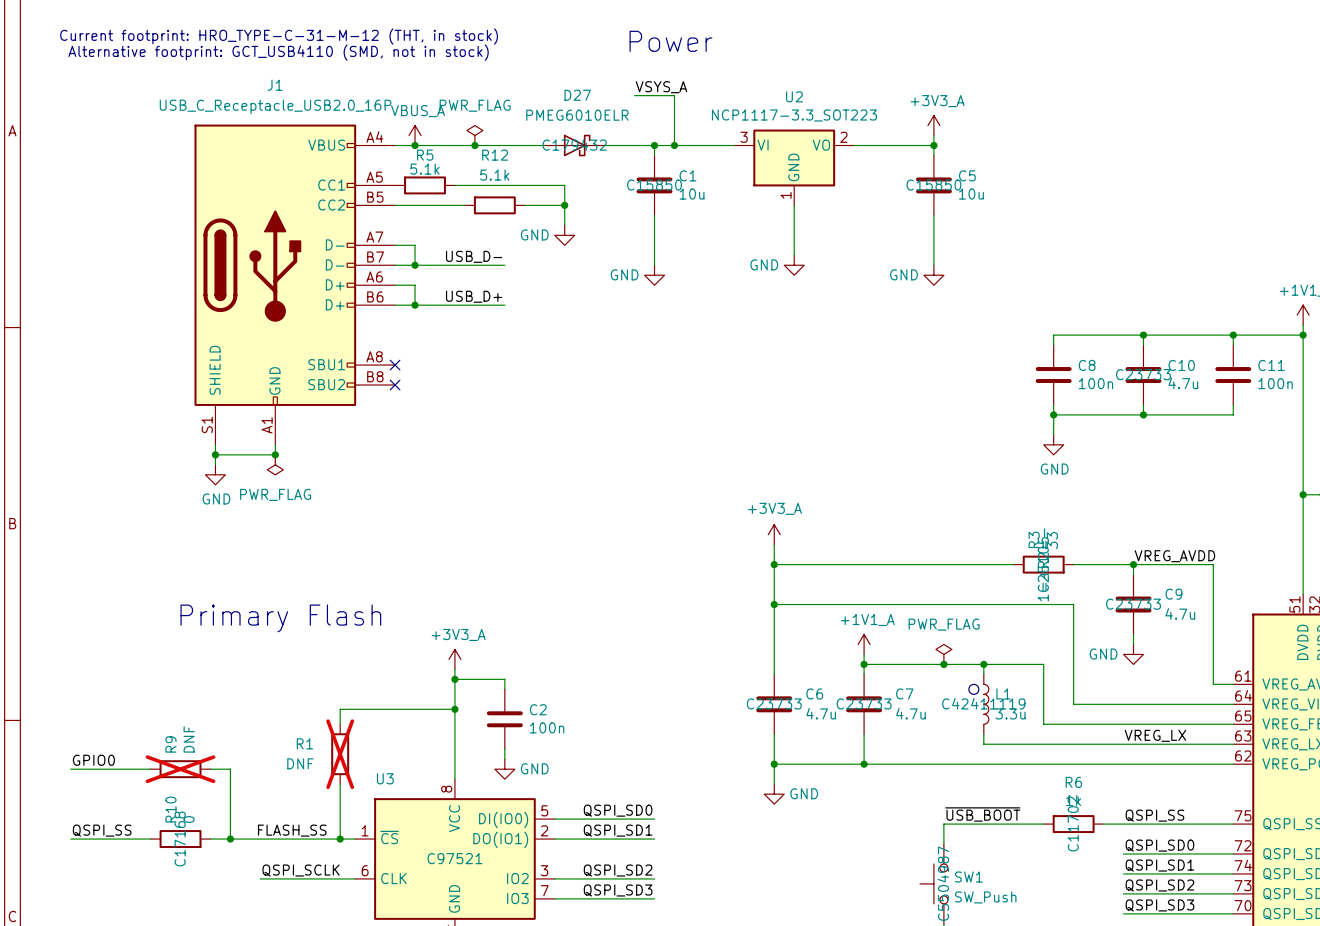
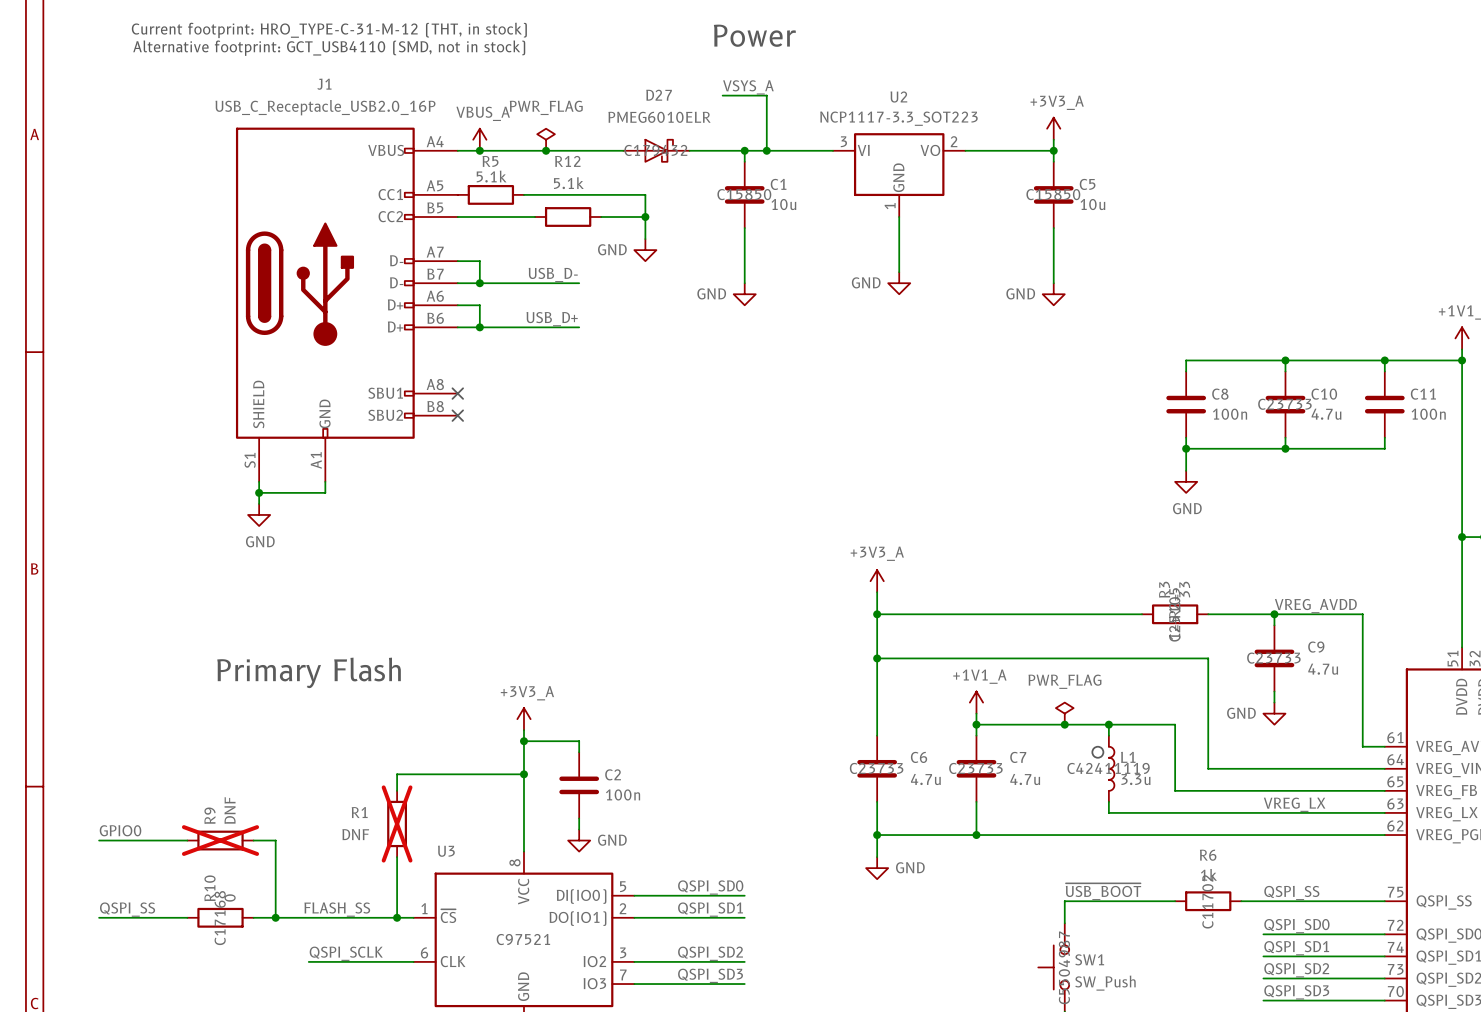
junction: (275, 454) -> none
power symbol: PWR_FLAG (275, 464) -> none

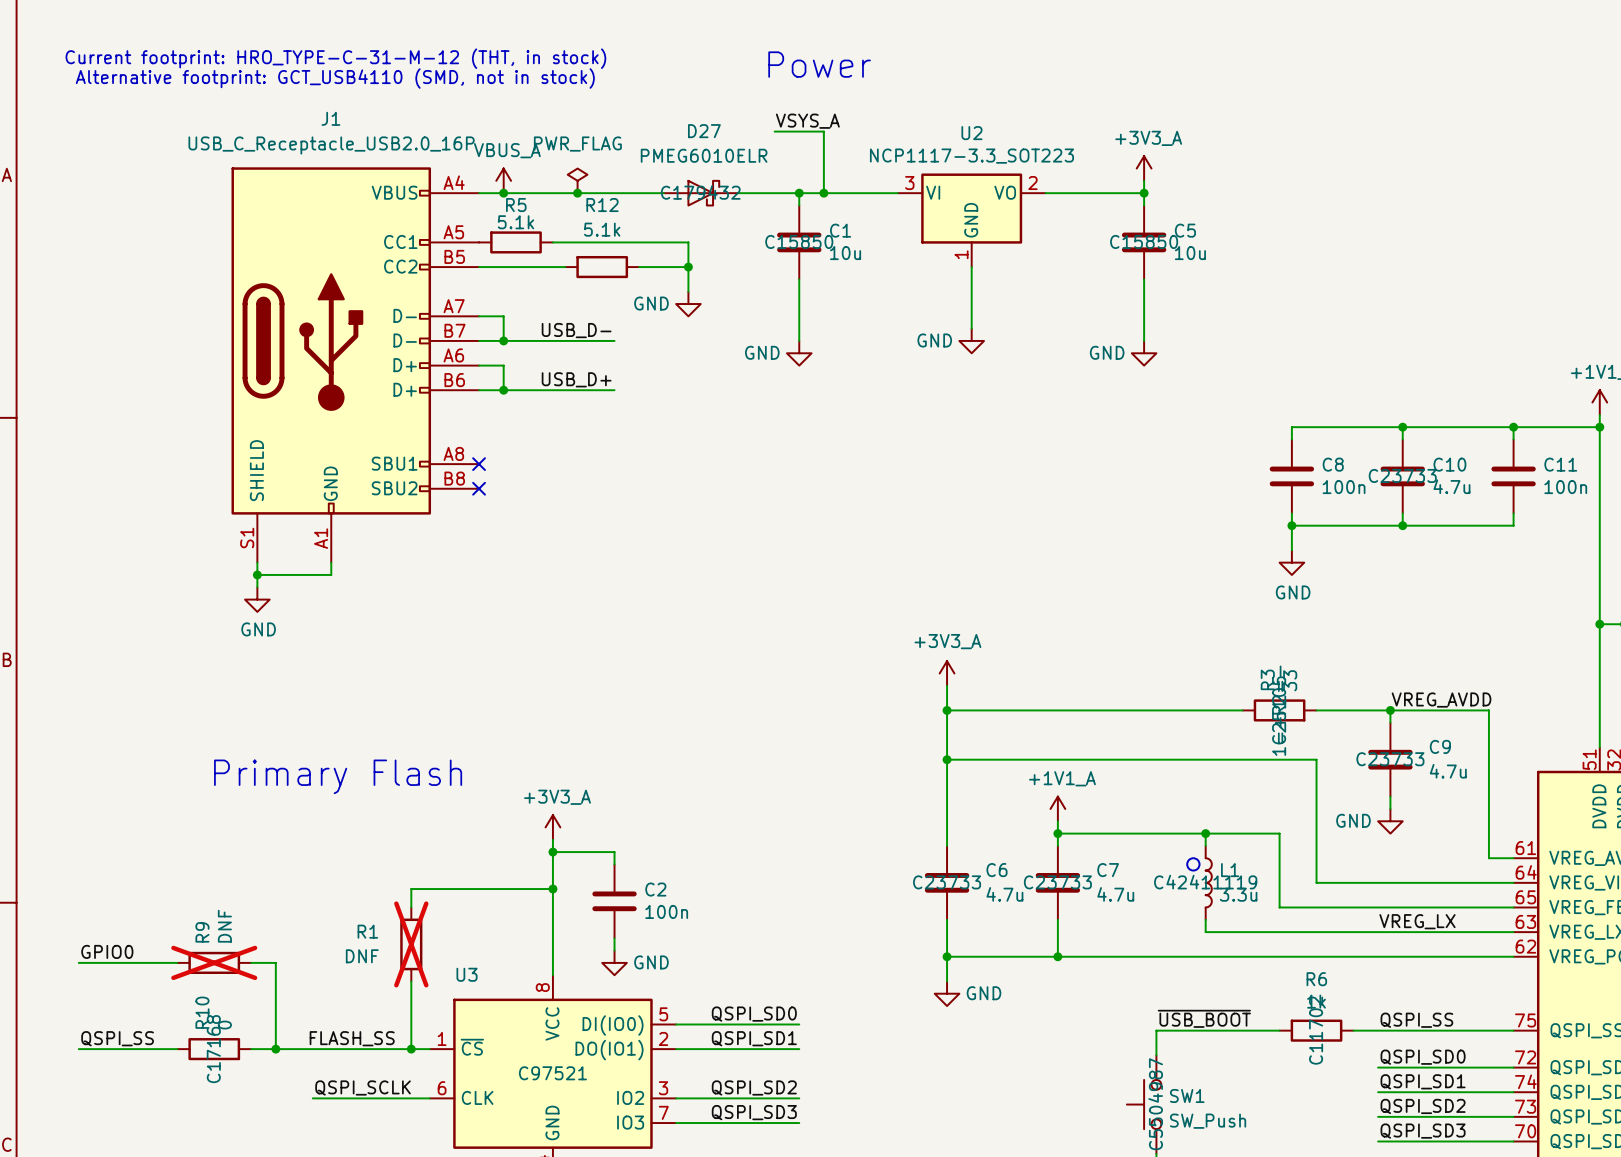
power symbol: PWR_FLAG (1064, 713) -> none
junction: (1064, 724) -> none

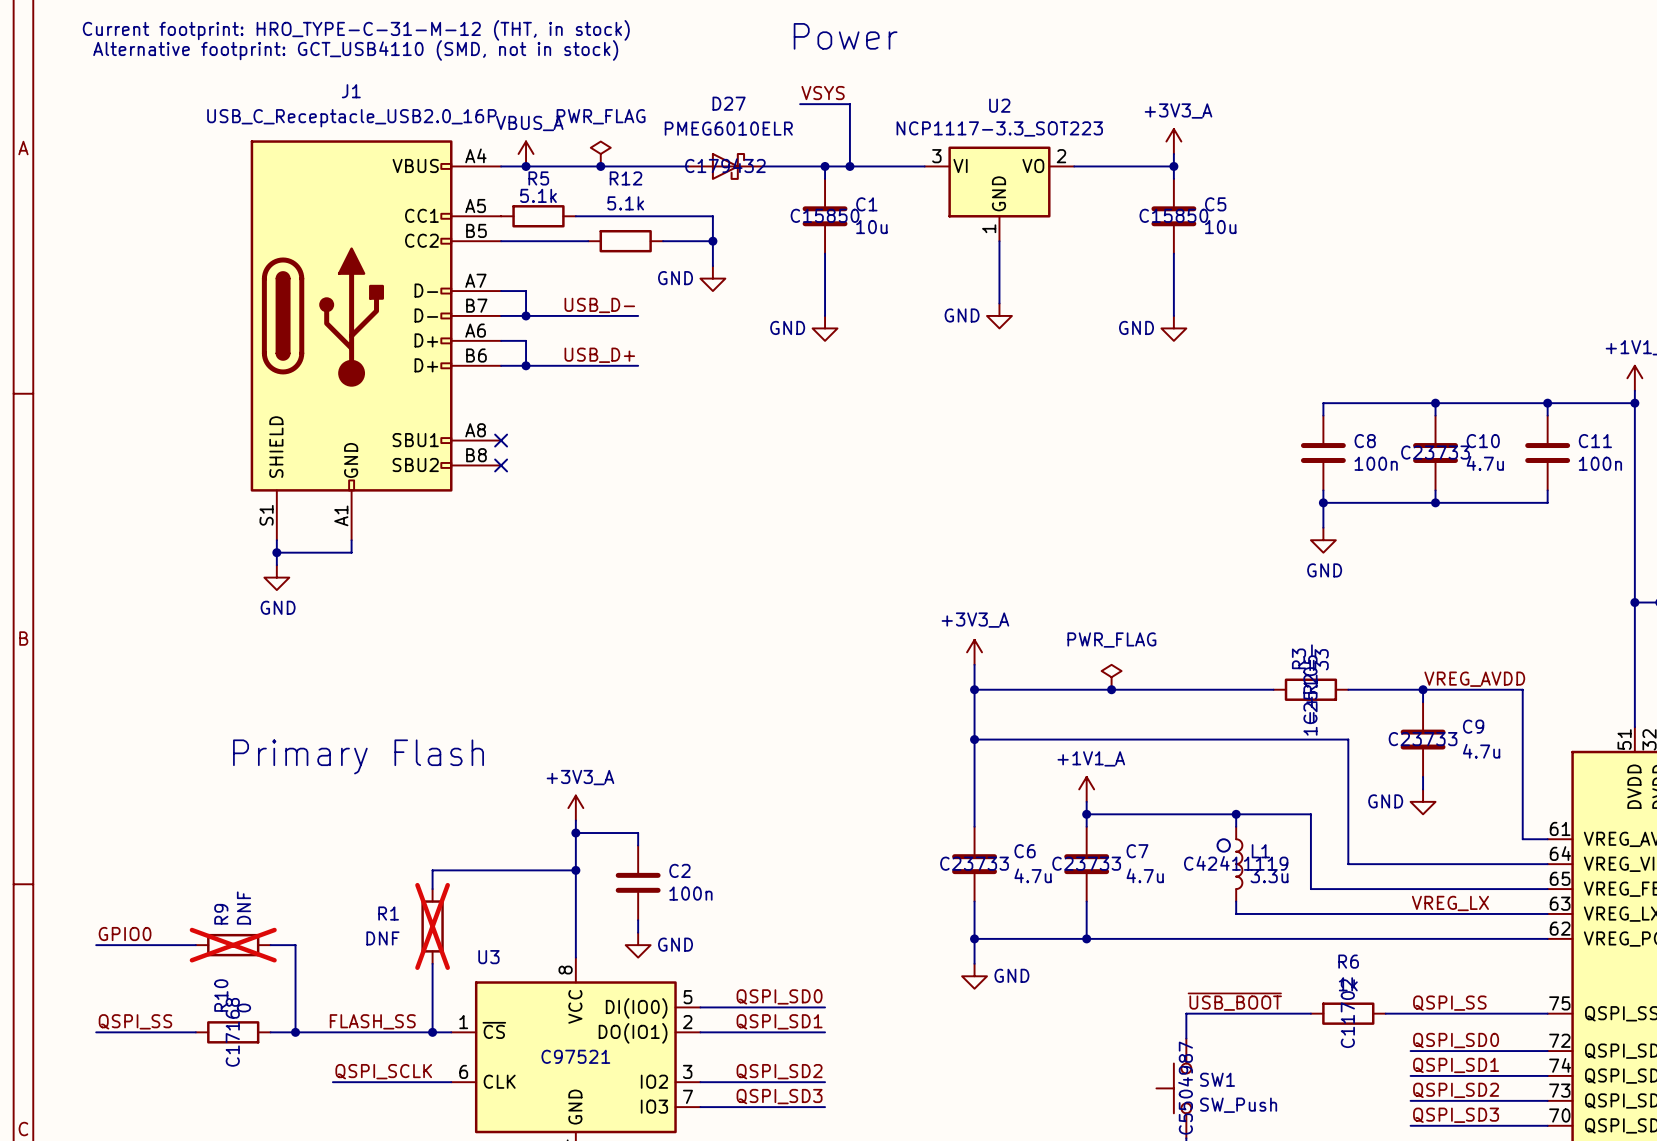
label: VSYS_A (807, 121) -> VSYS (823, 93)
power symbol: none -> PWR_FLAG (1111, 677)
junction: none -> (1111, 689)

